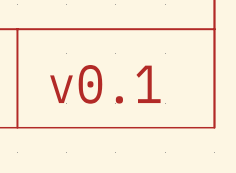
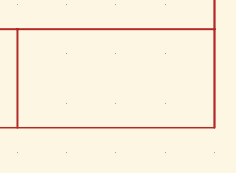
text: v0.1 (105, 84) -> none

